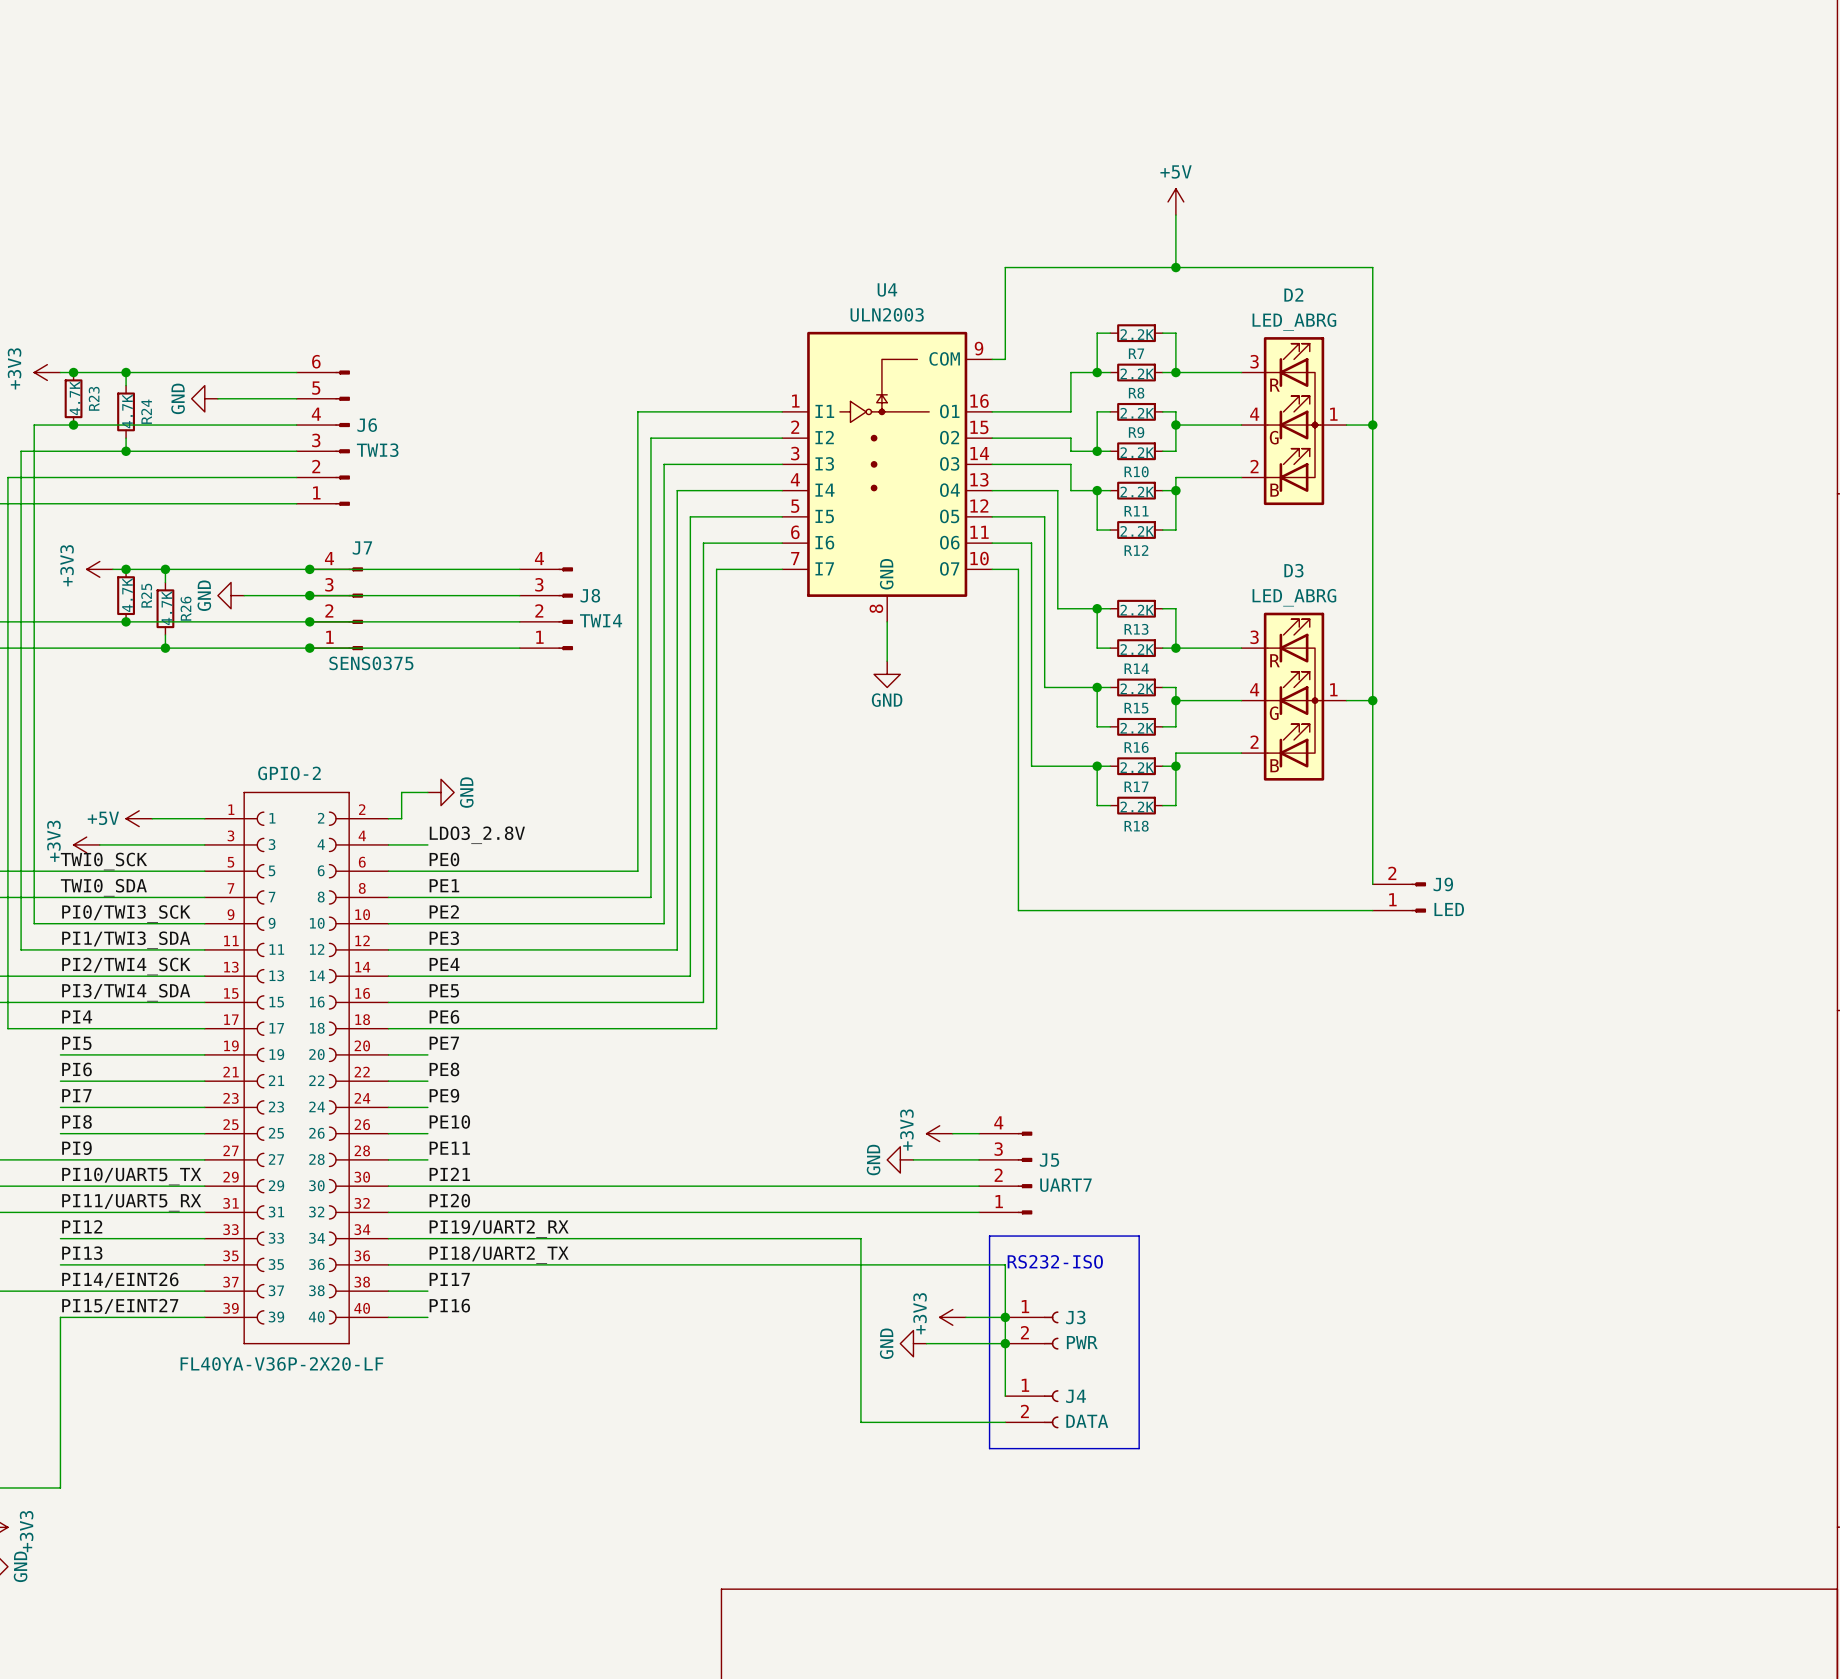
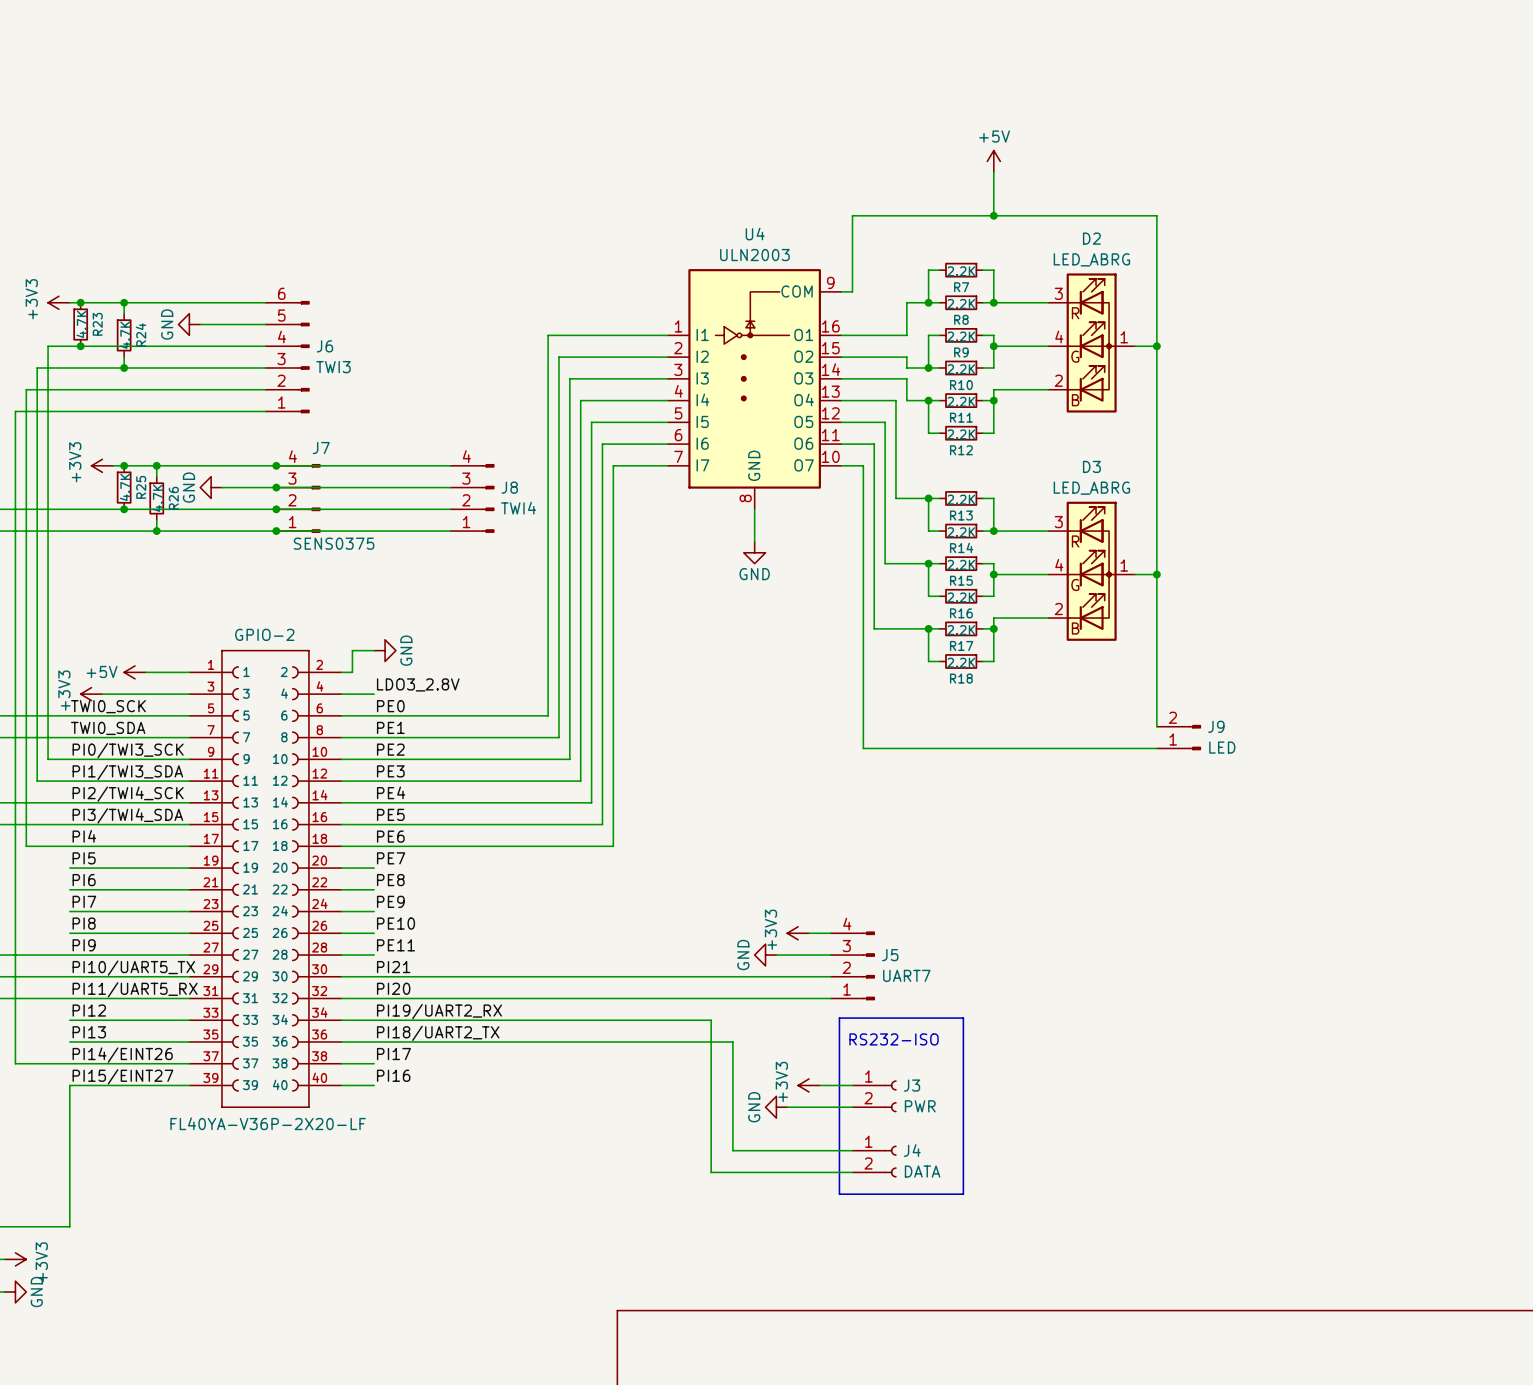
wire: (834, 1238) (860, 1238) (860, 1264) (1005, 1264) (1005, 1396) -> (711, 1020) (711, 1172) (732, 1172)
junction: (1005, 1317) -> none
junction: (1005, 1343) -> none
wire: (860, 1396) (860, 1422) -> (732, 1150) (852, 1150)

